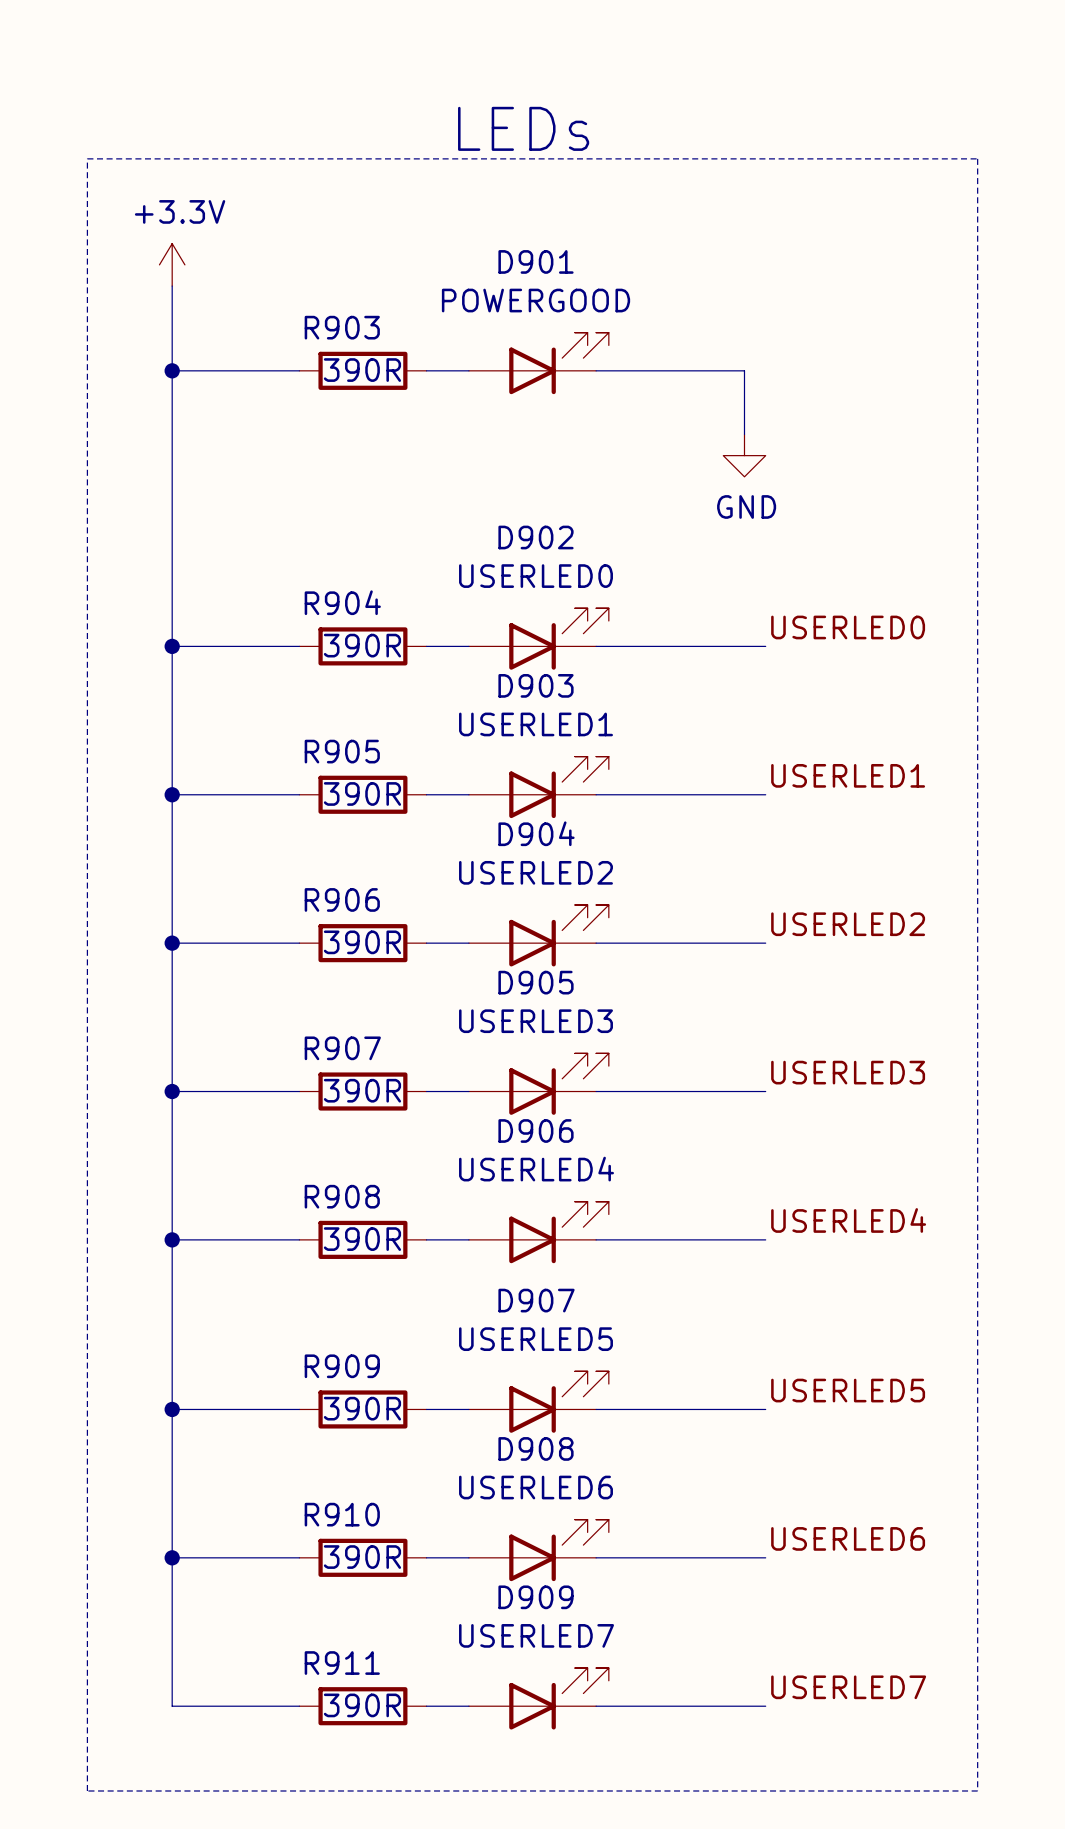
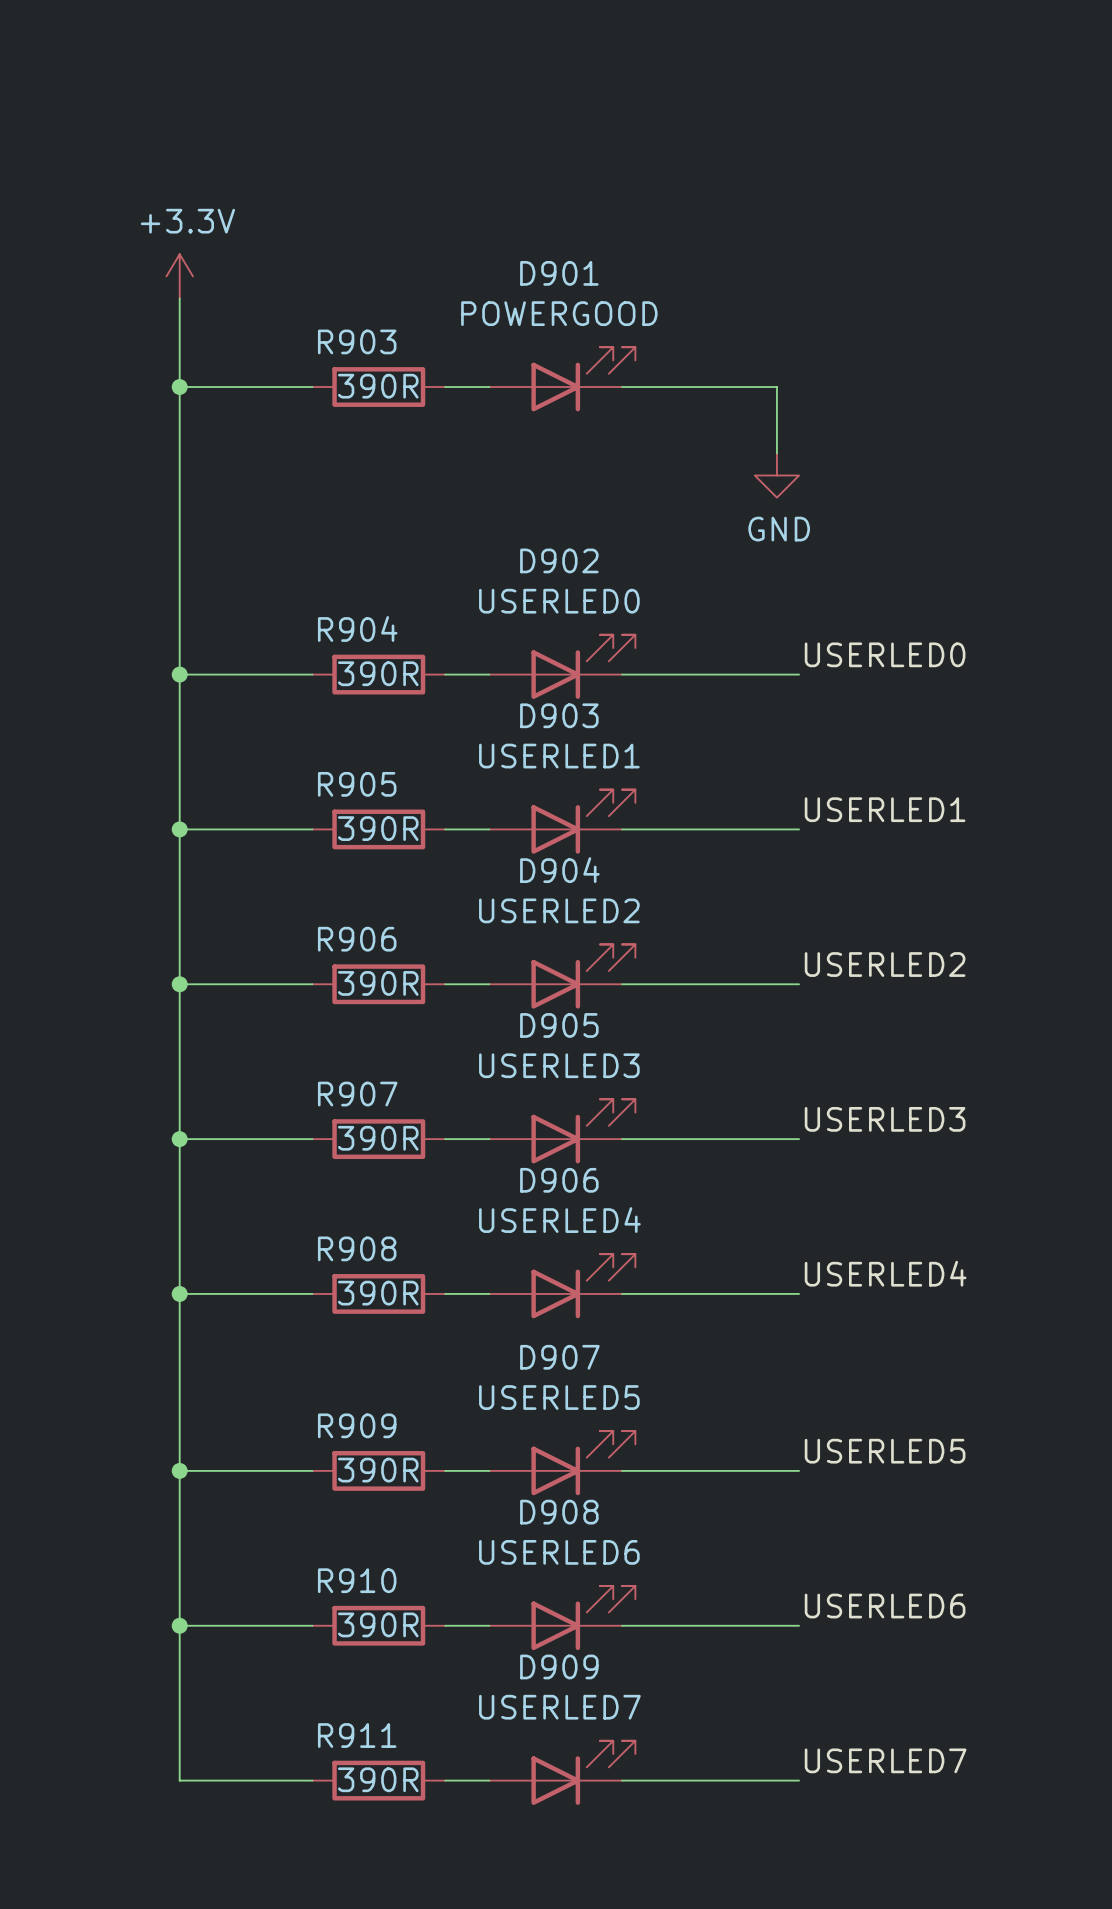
text: LEDs (523, 128) -> none
line: (87, 158) (977, 158) (977, 1790) (87, 1790) (87, 158) -> none

